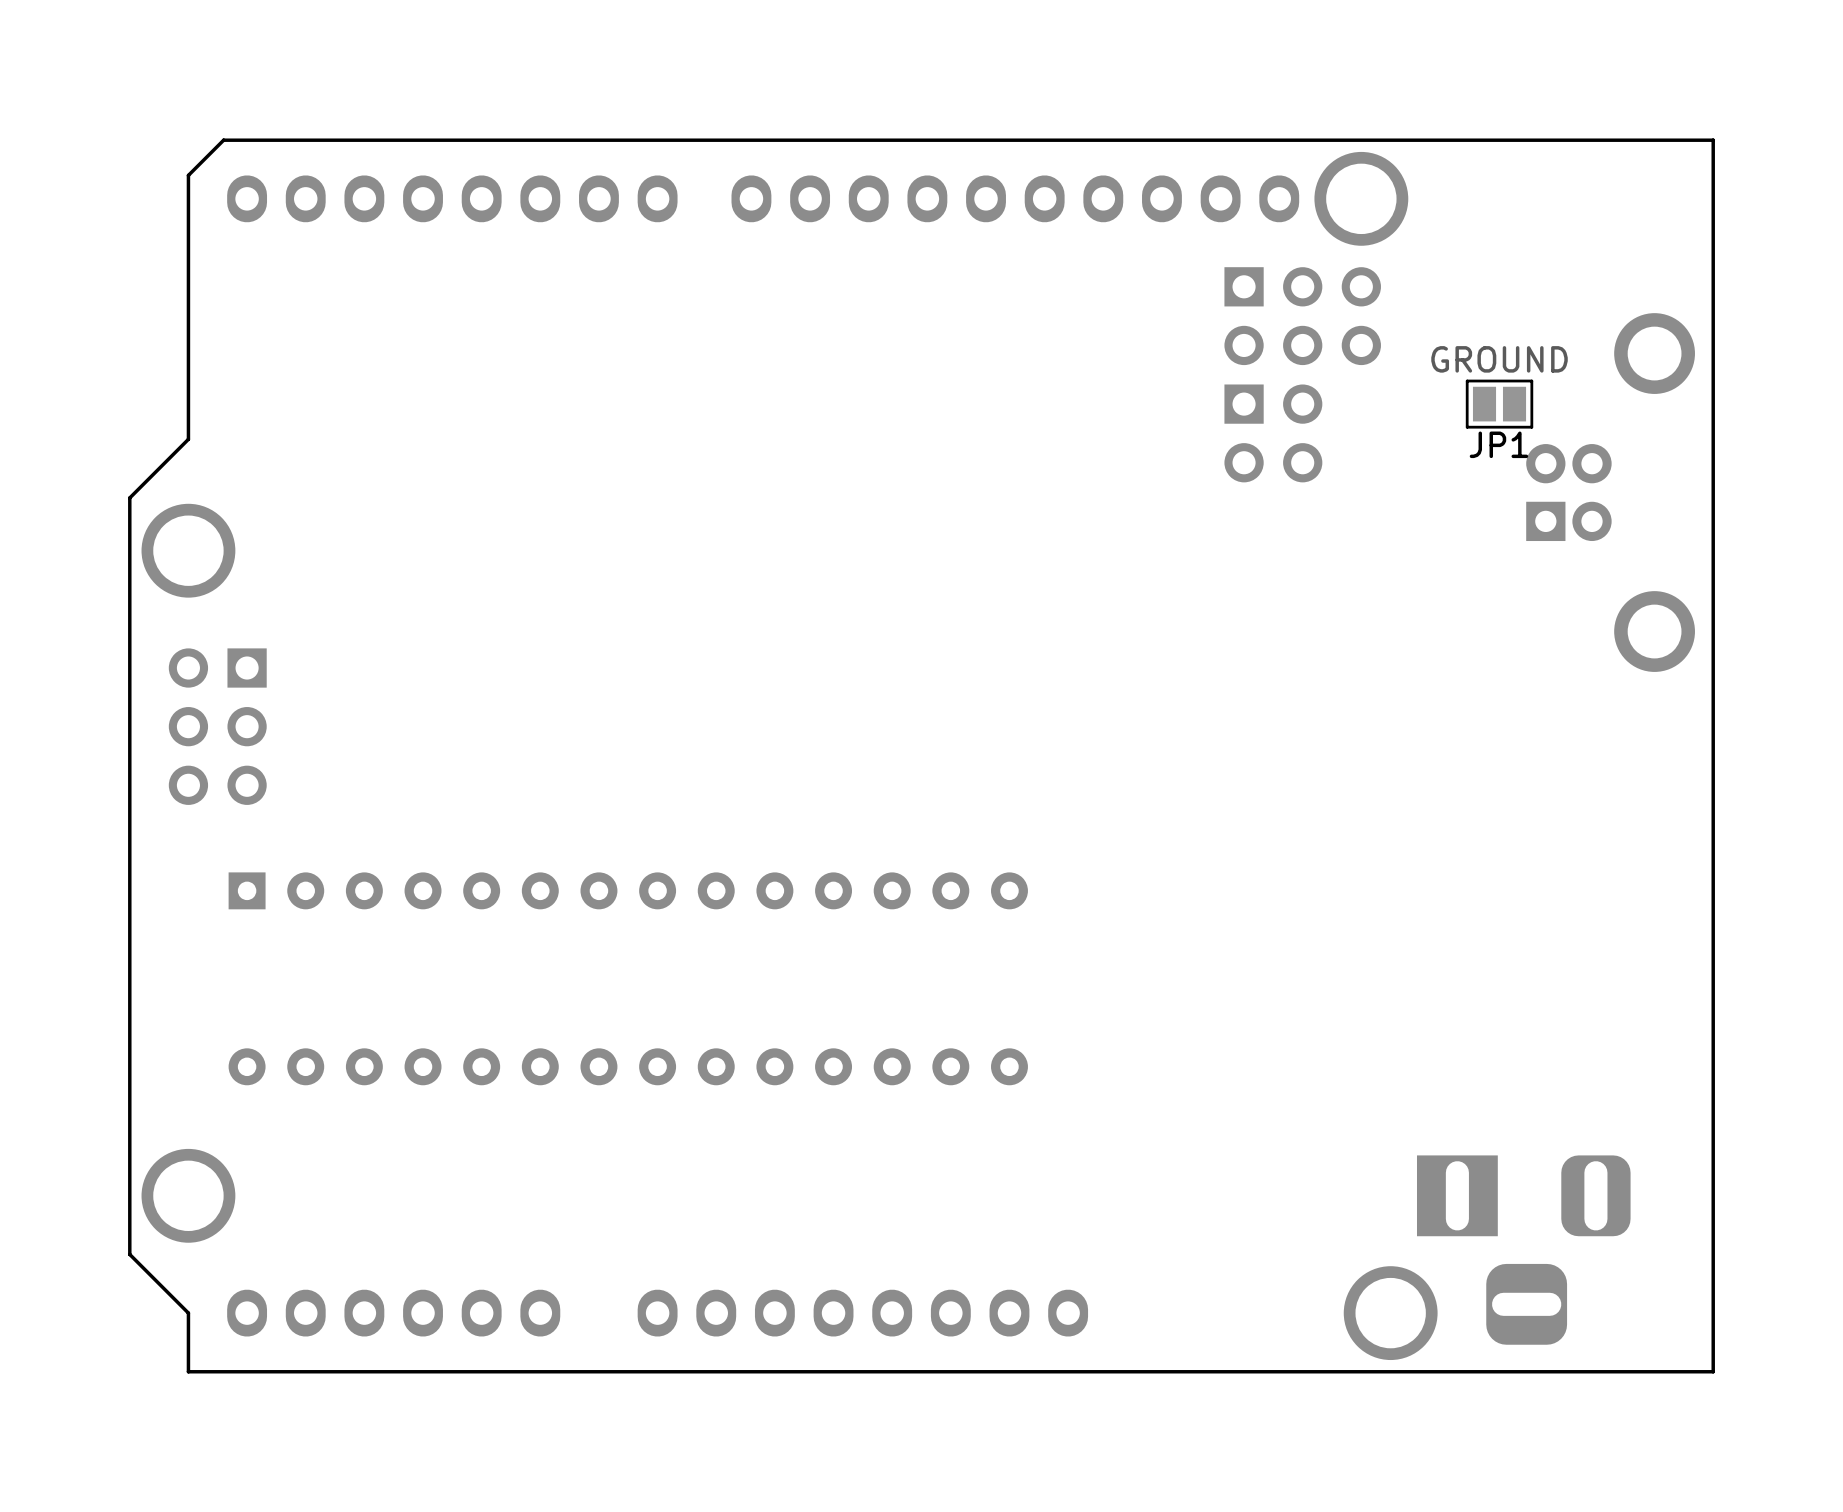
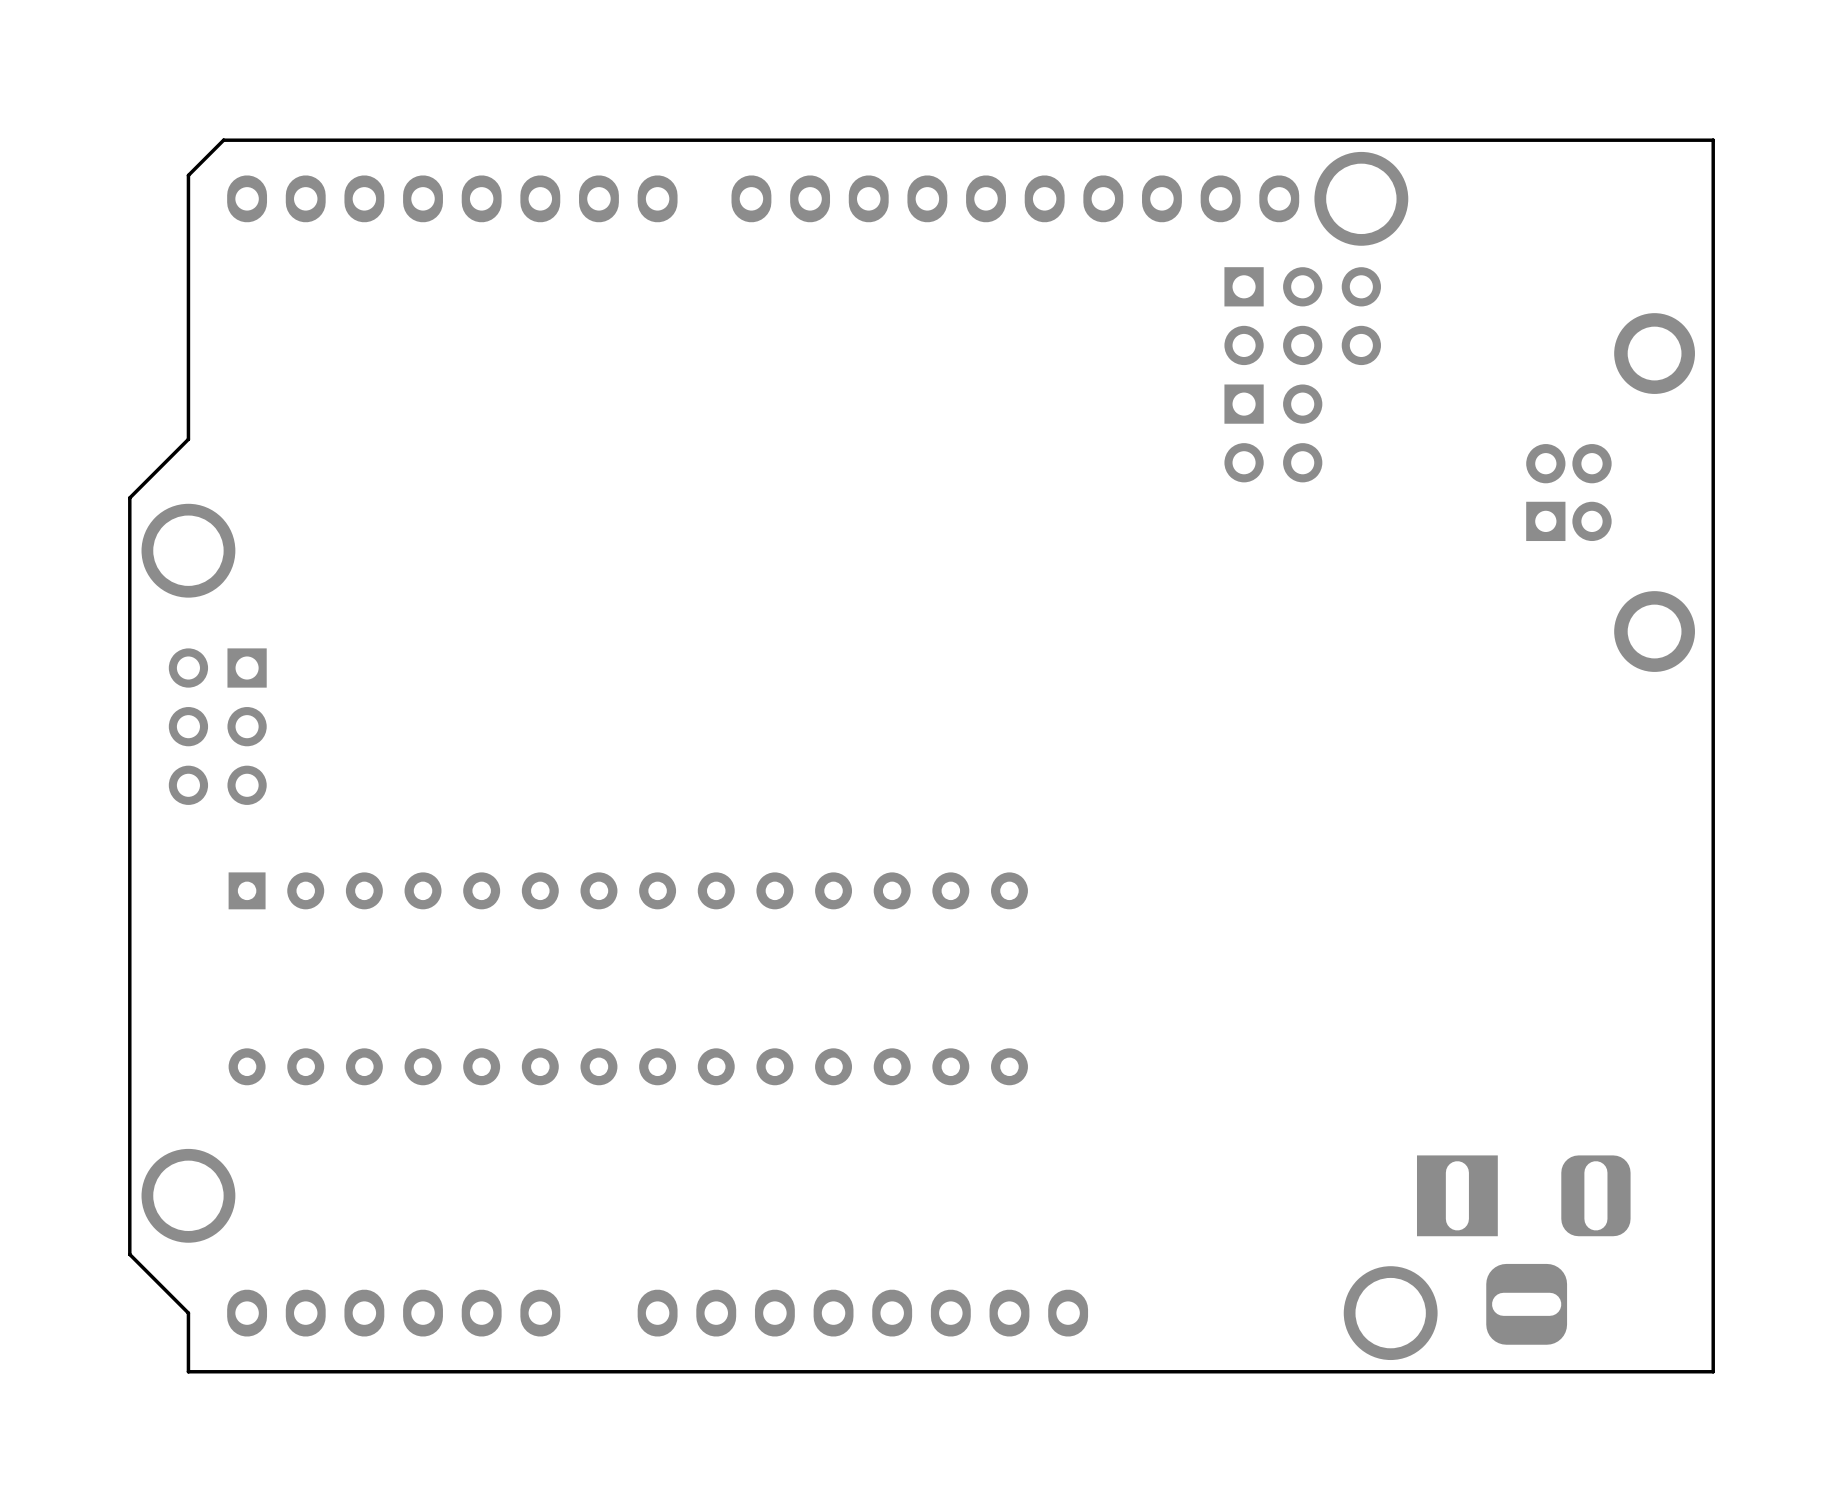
JP1: GROUND (1499, 404) -> none

